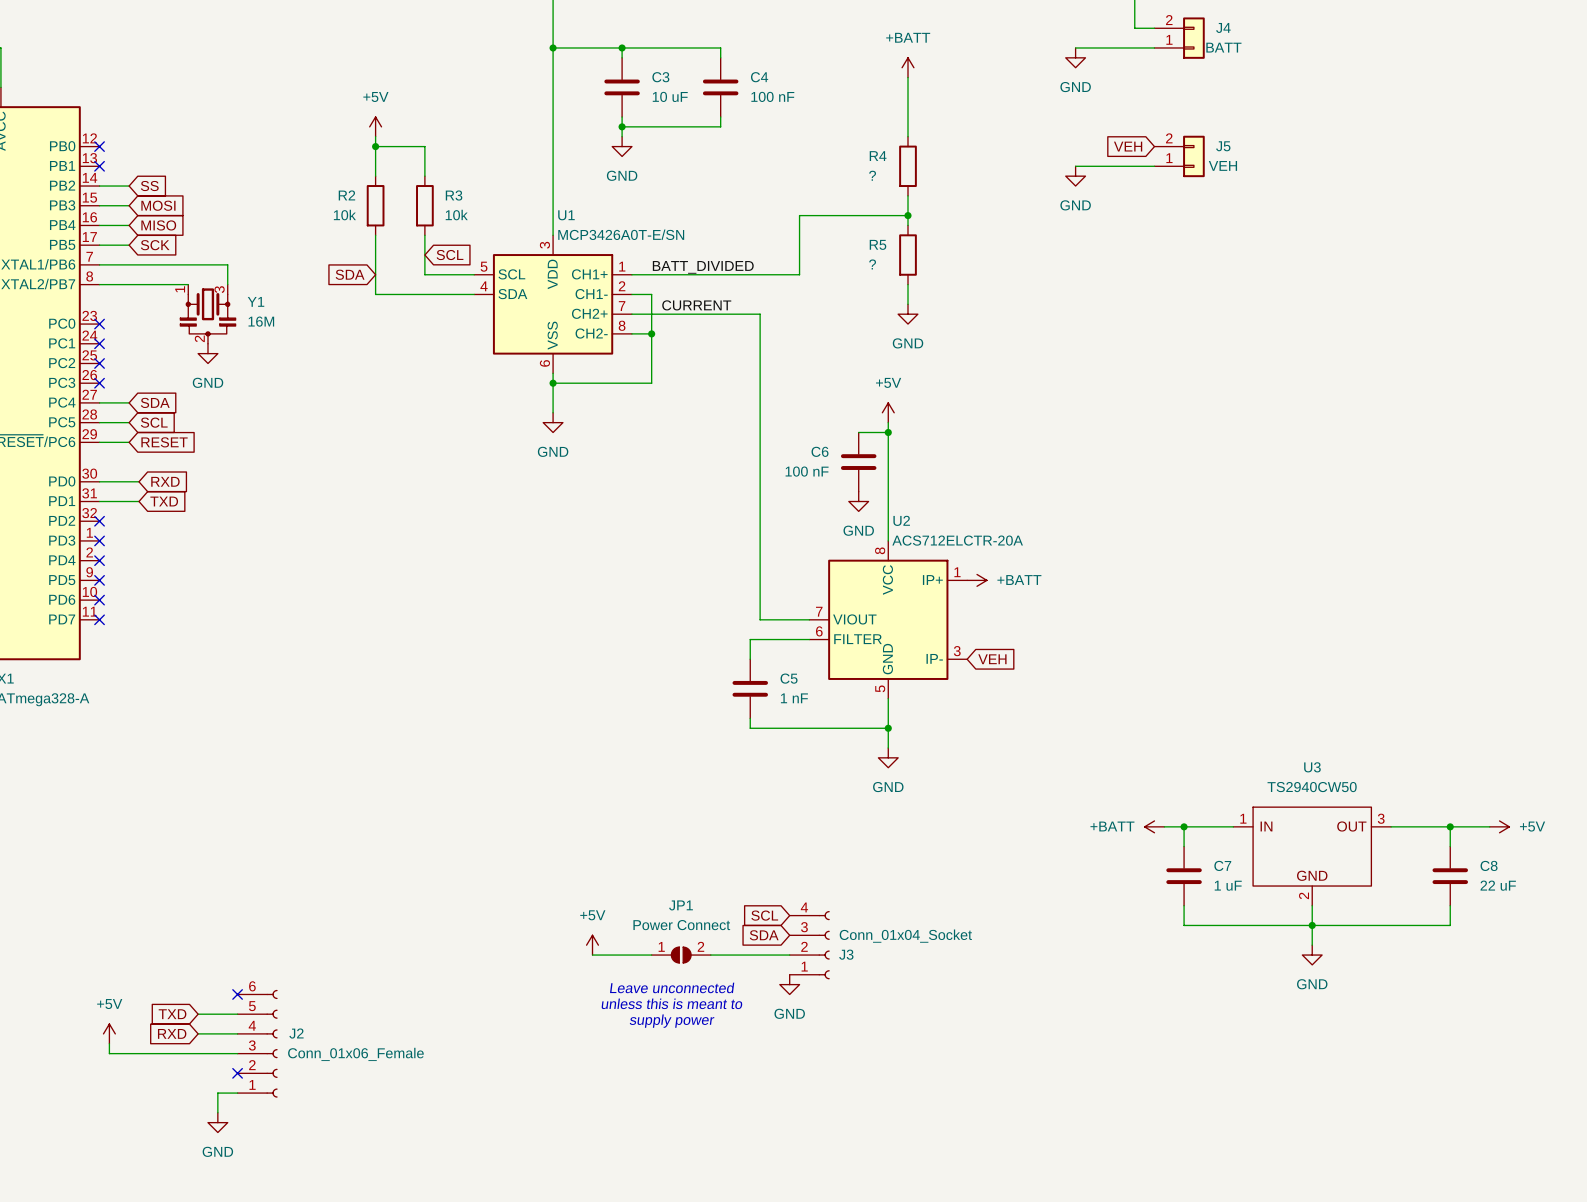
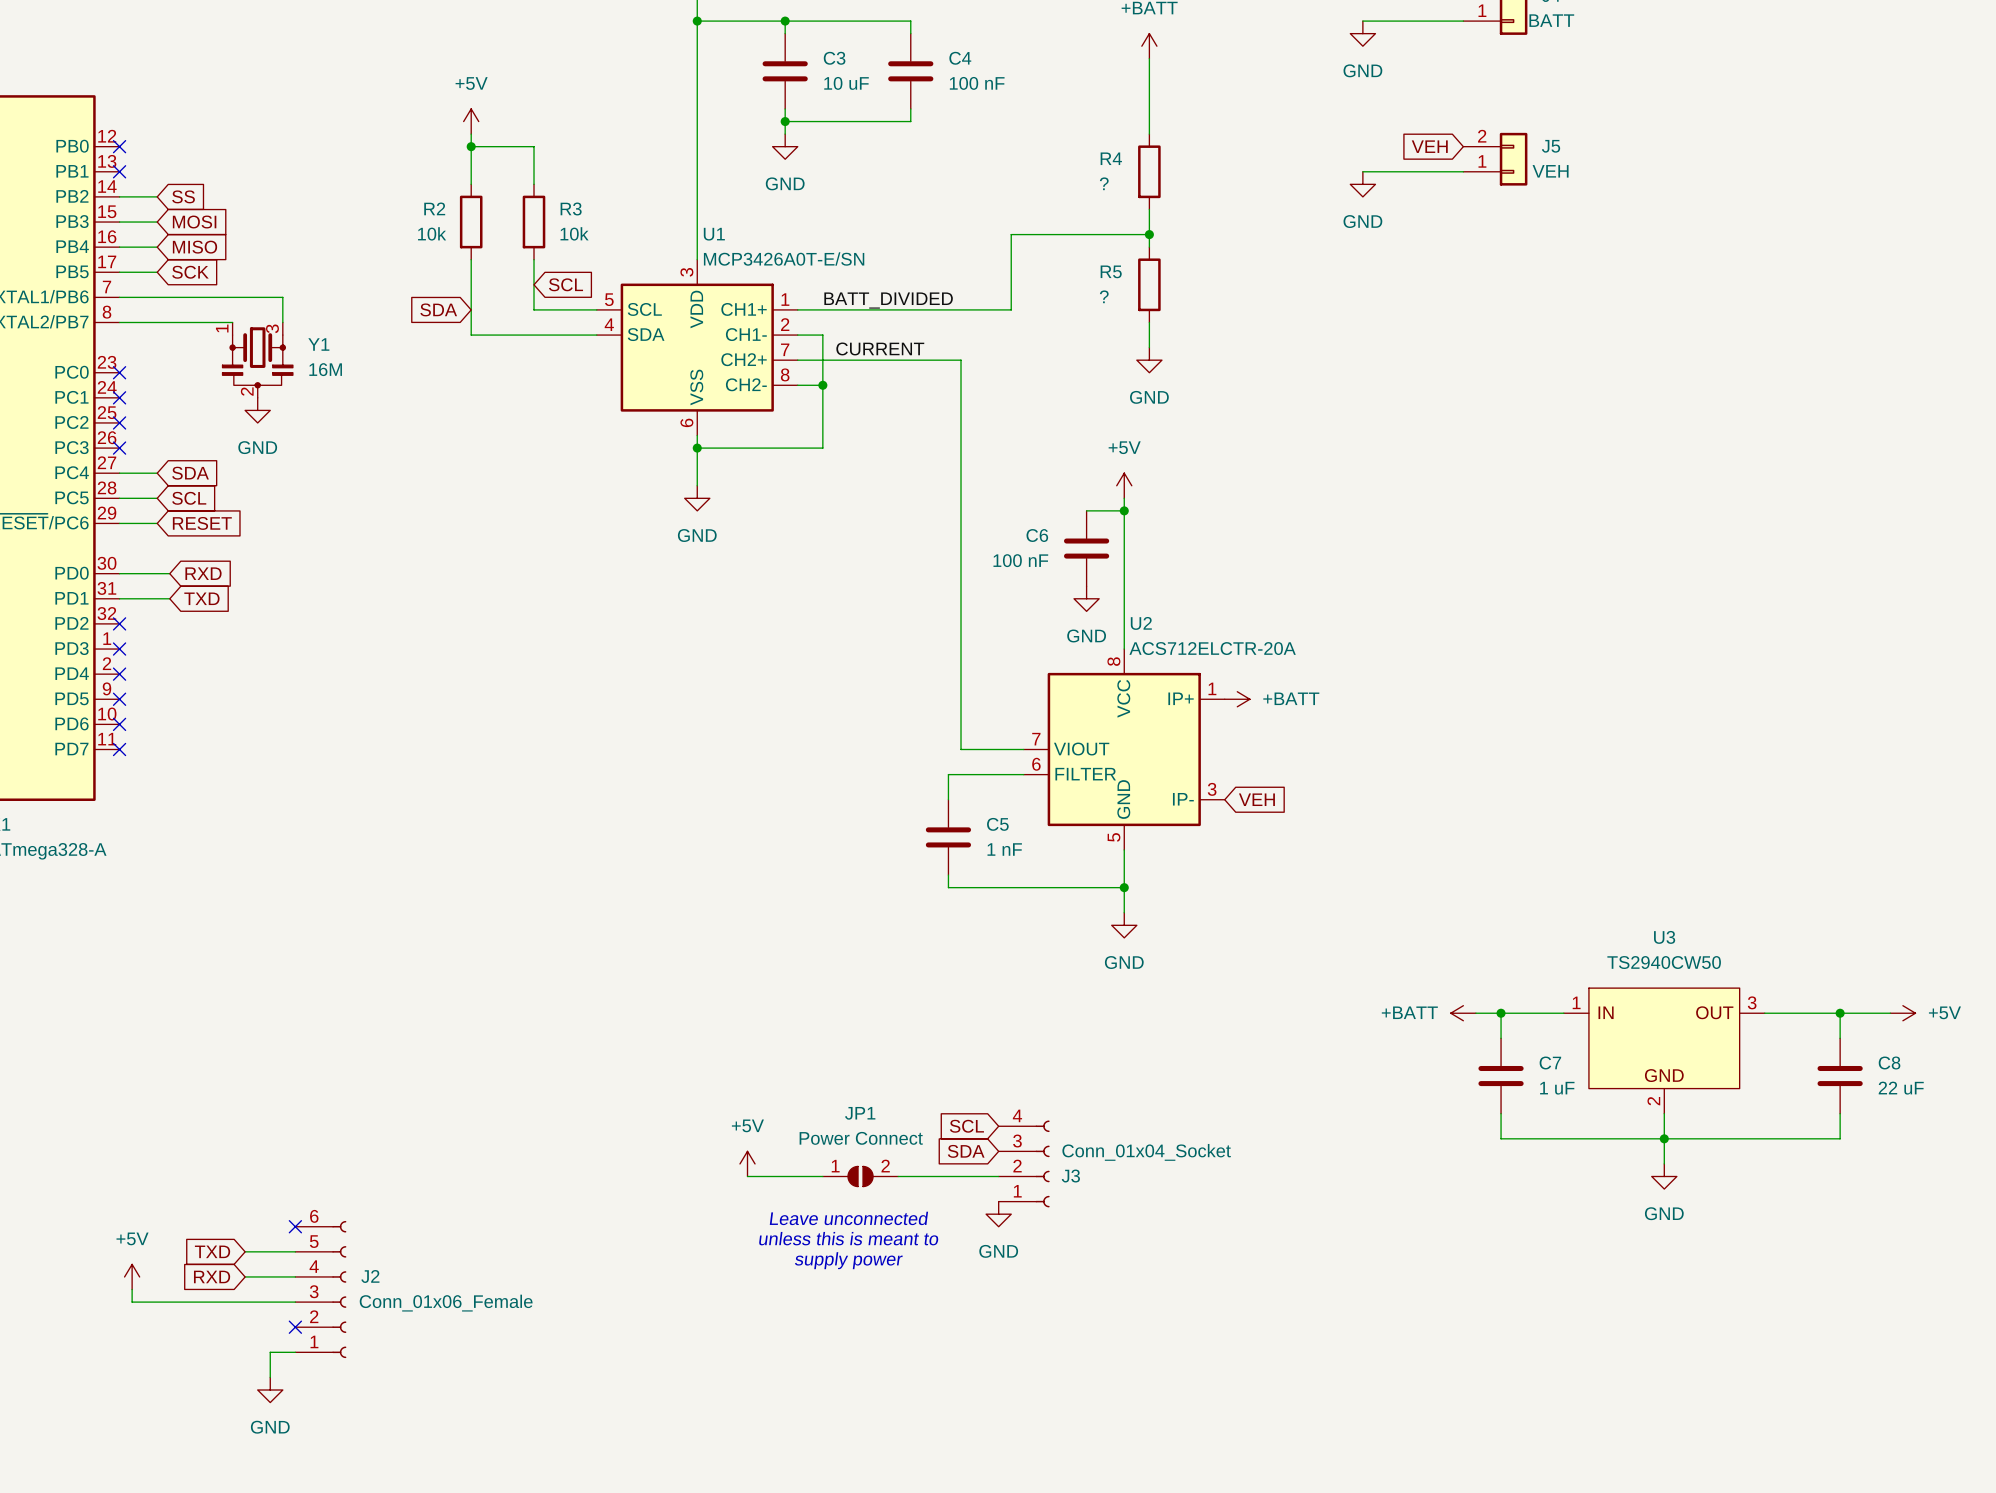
U3 symbol: [1233, 807, 1392, 906] -> [1563, 988, 1765, 1114]

